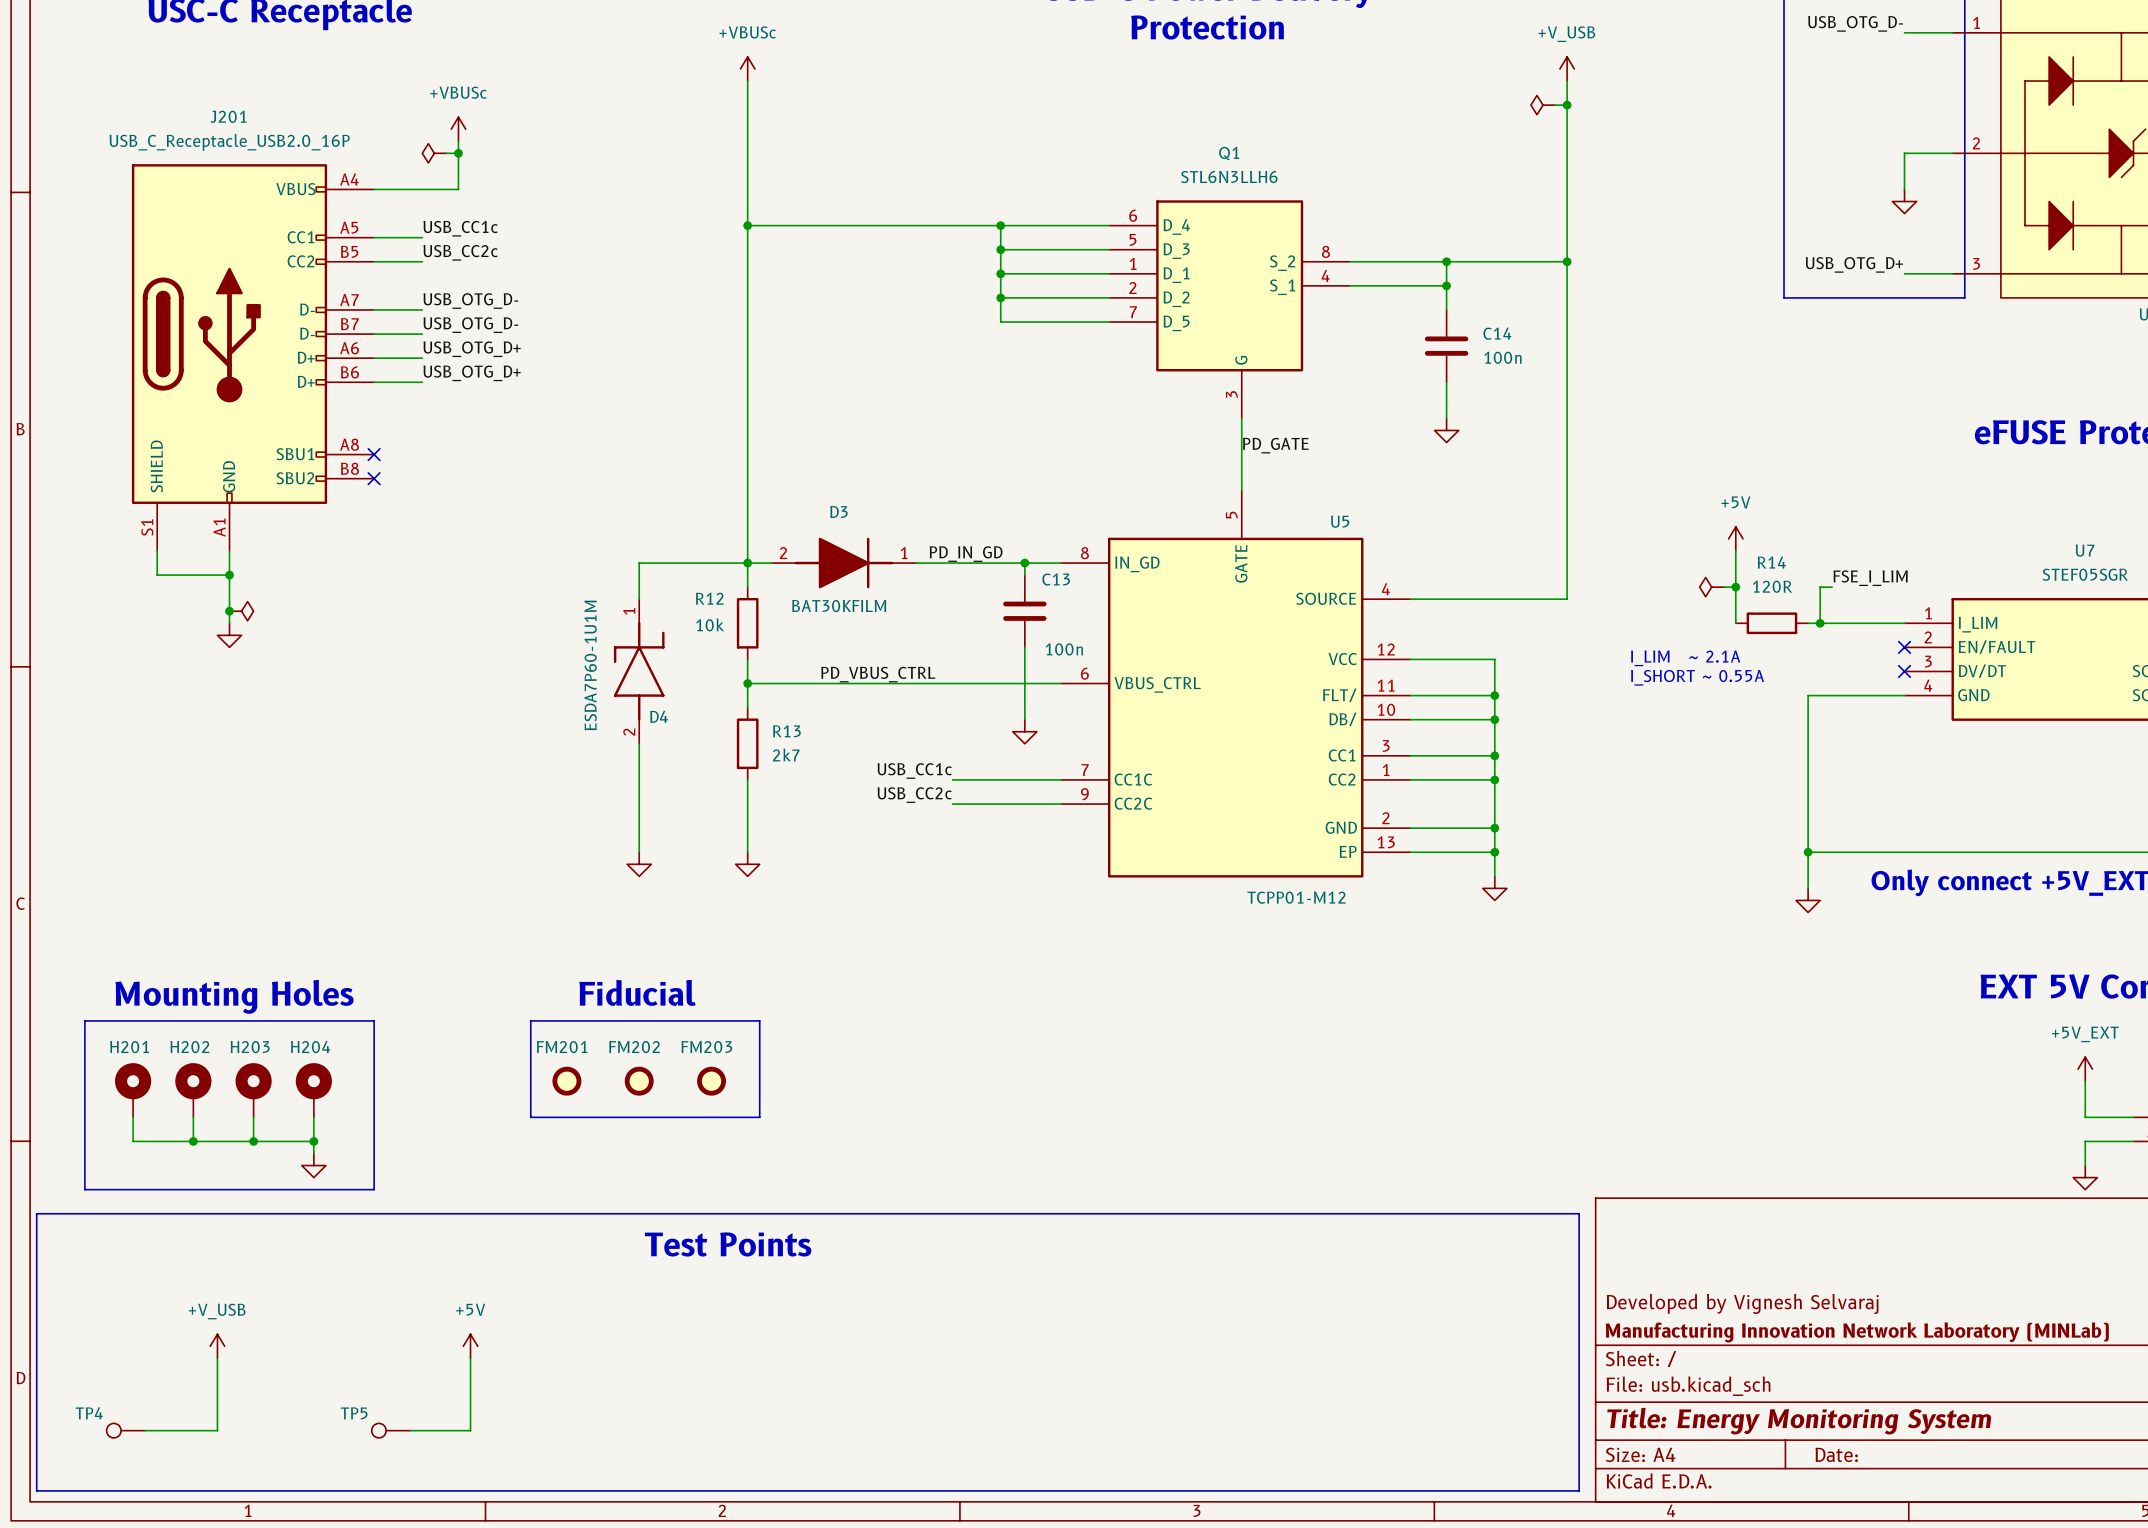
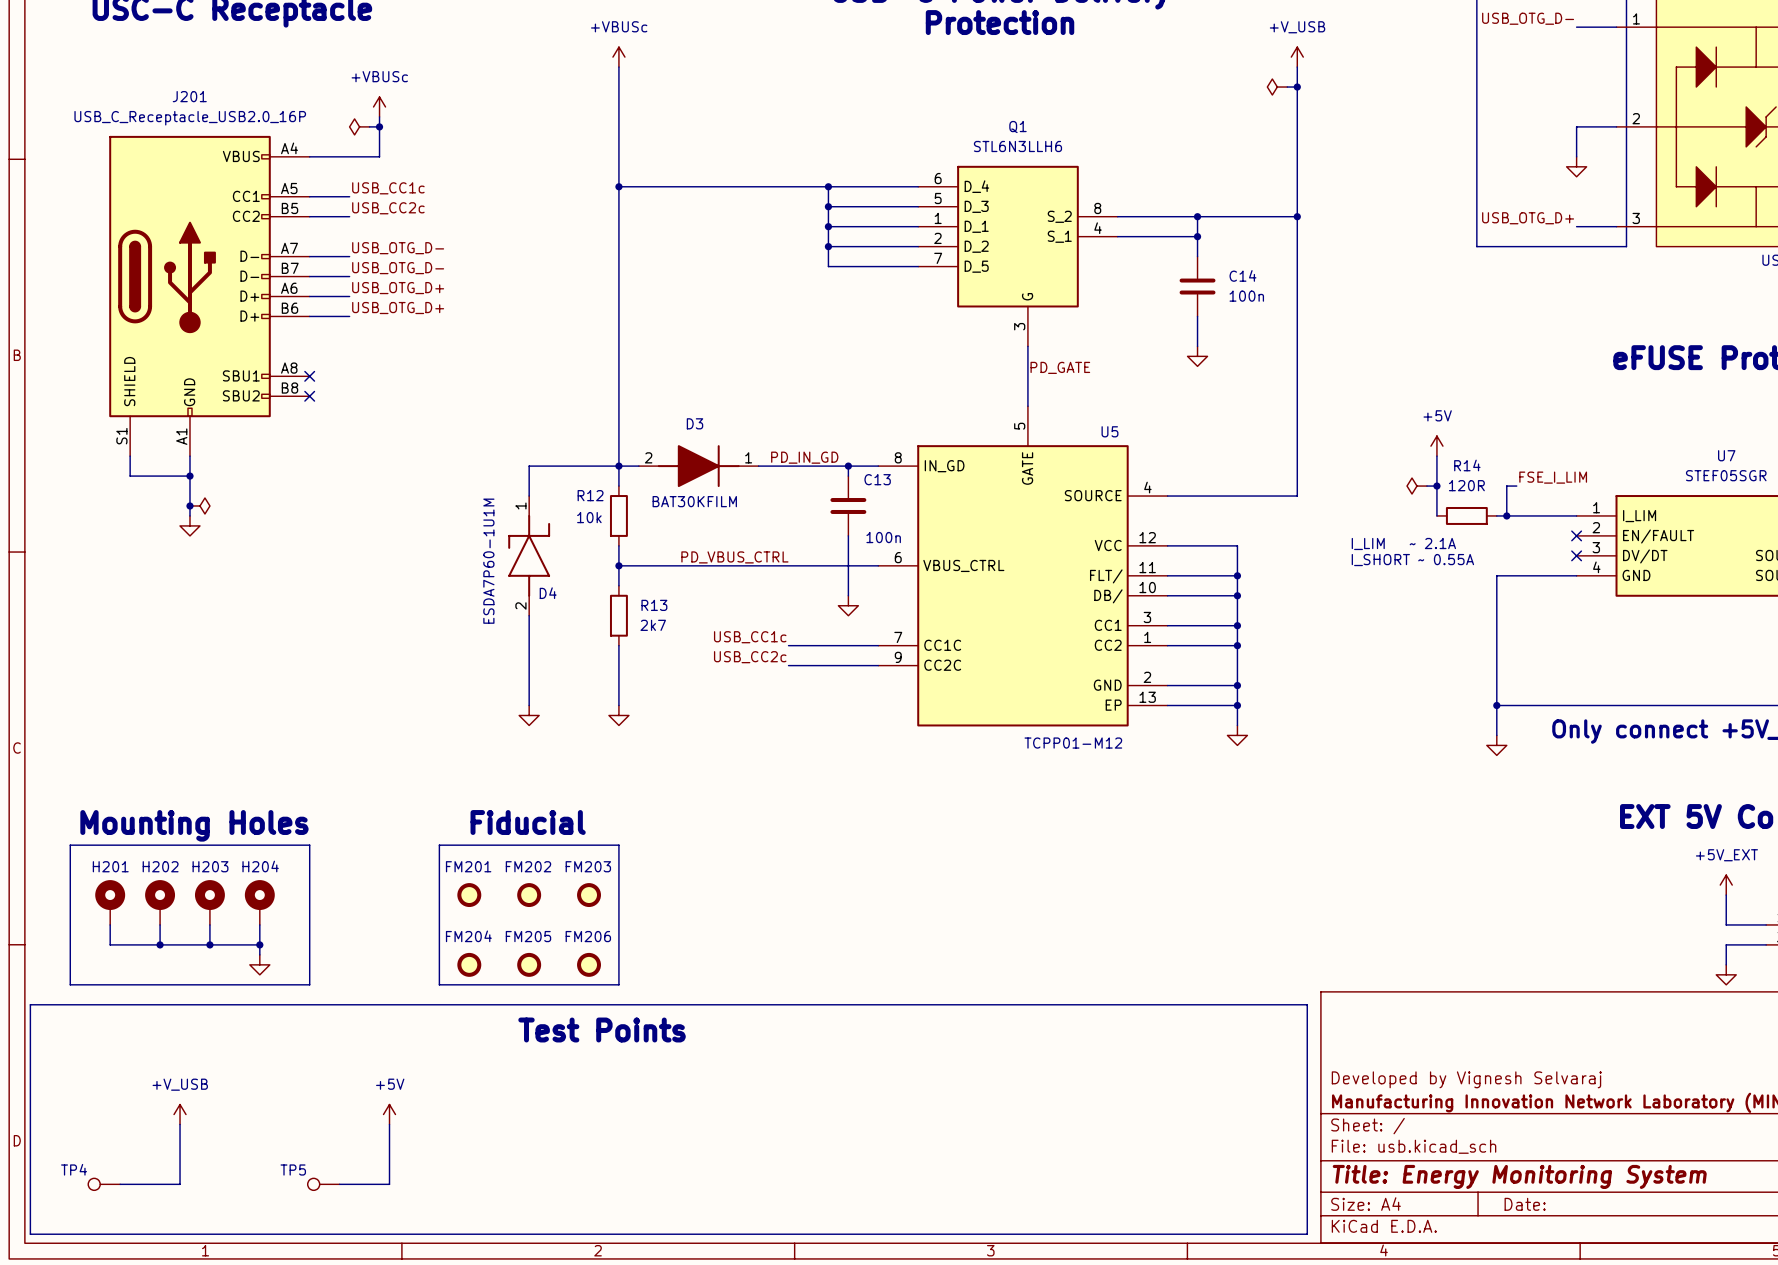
line: (747, 1020) (759, 1020) (759, 1117) (530, 1117) -> (618, 845) (618, 984) (439, 984) (439, 924)
FM204: none -> (469, 964)
FM205: none -> (529, 964)
FM206: none -> (589, 964)

